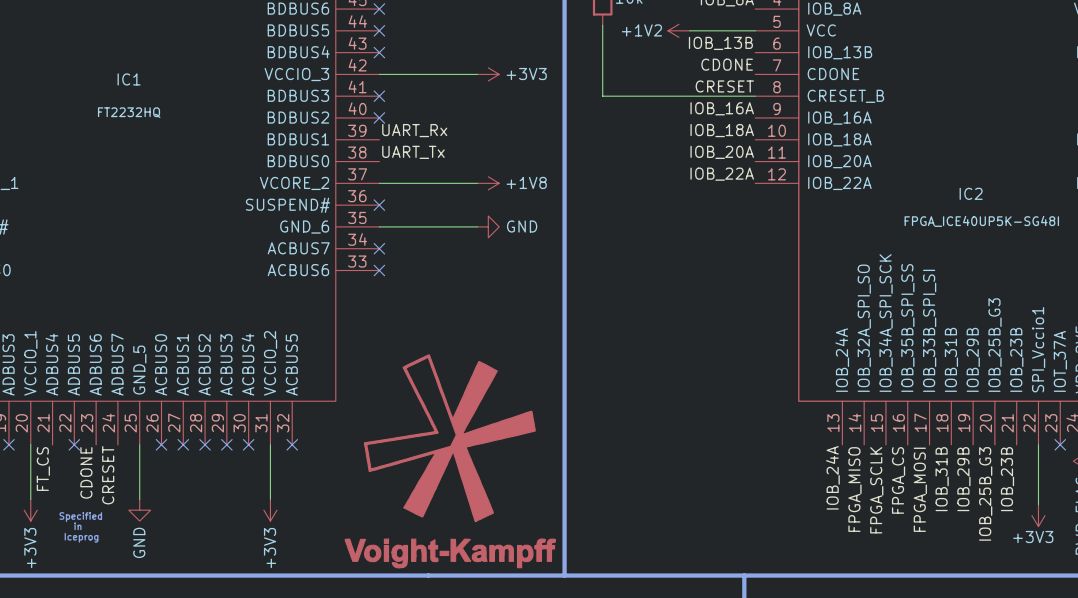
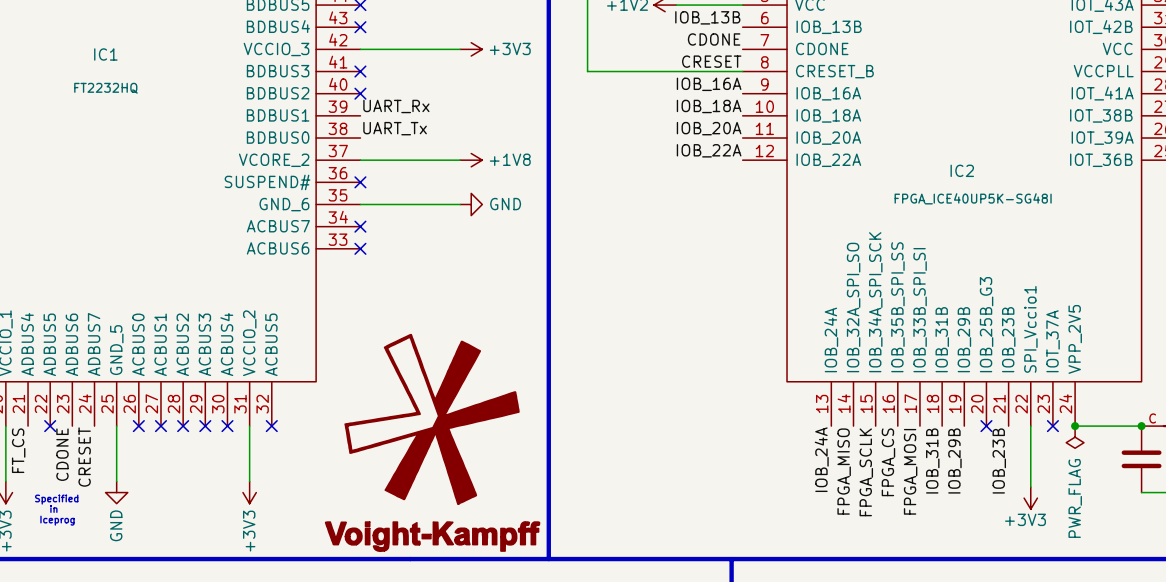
no-connect mark: none -> (986, 426)
label: IOB_25B_G3 (985, 493) -> none

